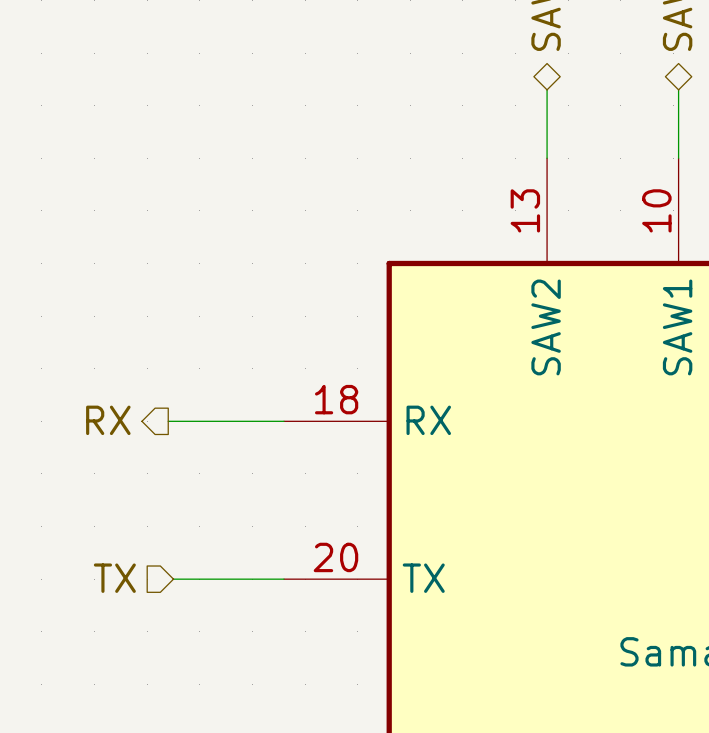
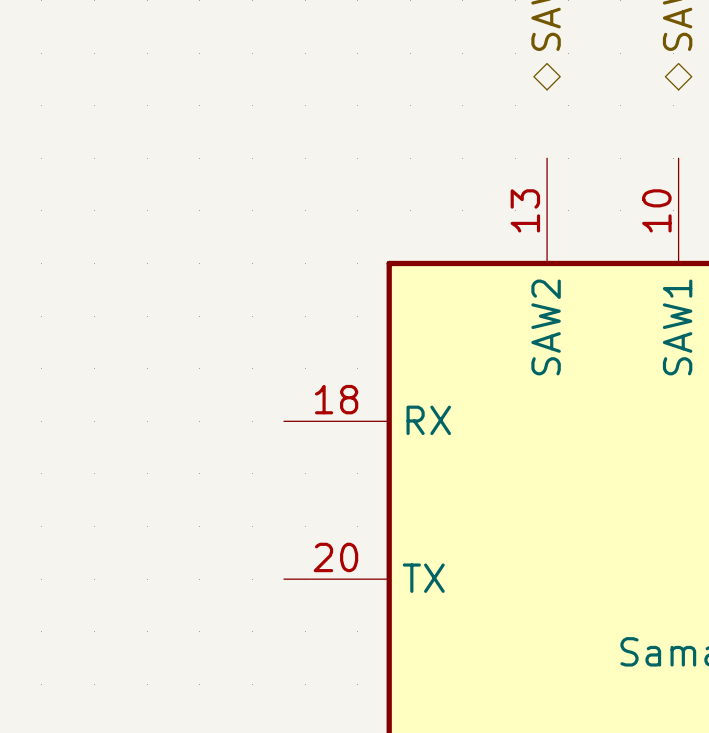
wire: (547, 89) (547, 158) -> none
wire: (678, 89) (678, 158) -> none
hierarchical label: RX (108, 420) -> none
wire: (168, 421) (283, 421) -> none
hierarchical label: TX (114, 578) -> none
wire: (173, 579) (283, 579) -> none

